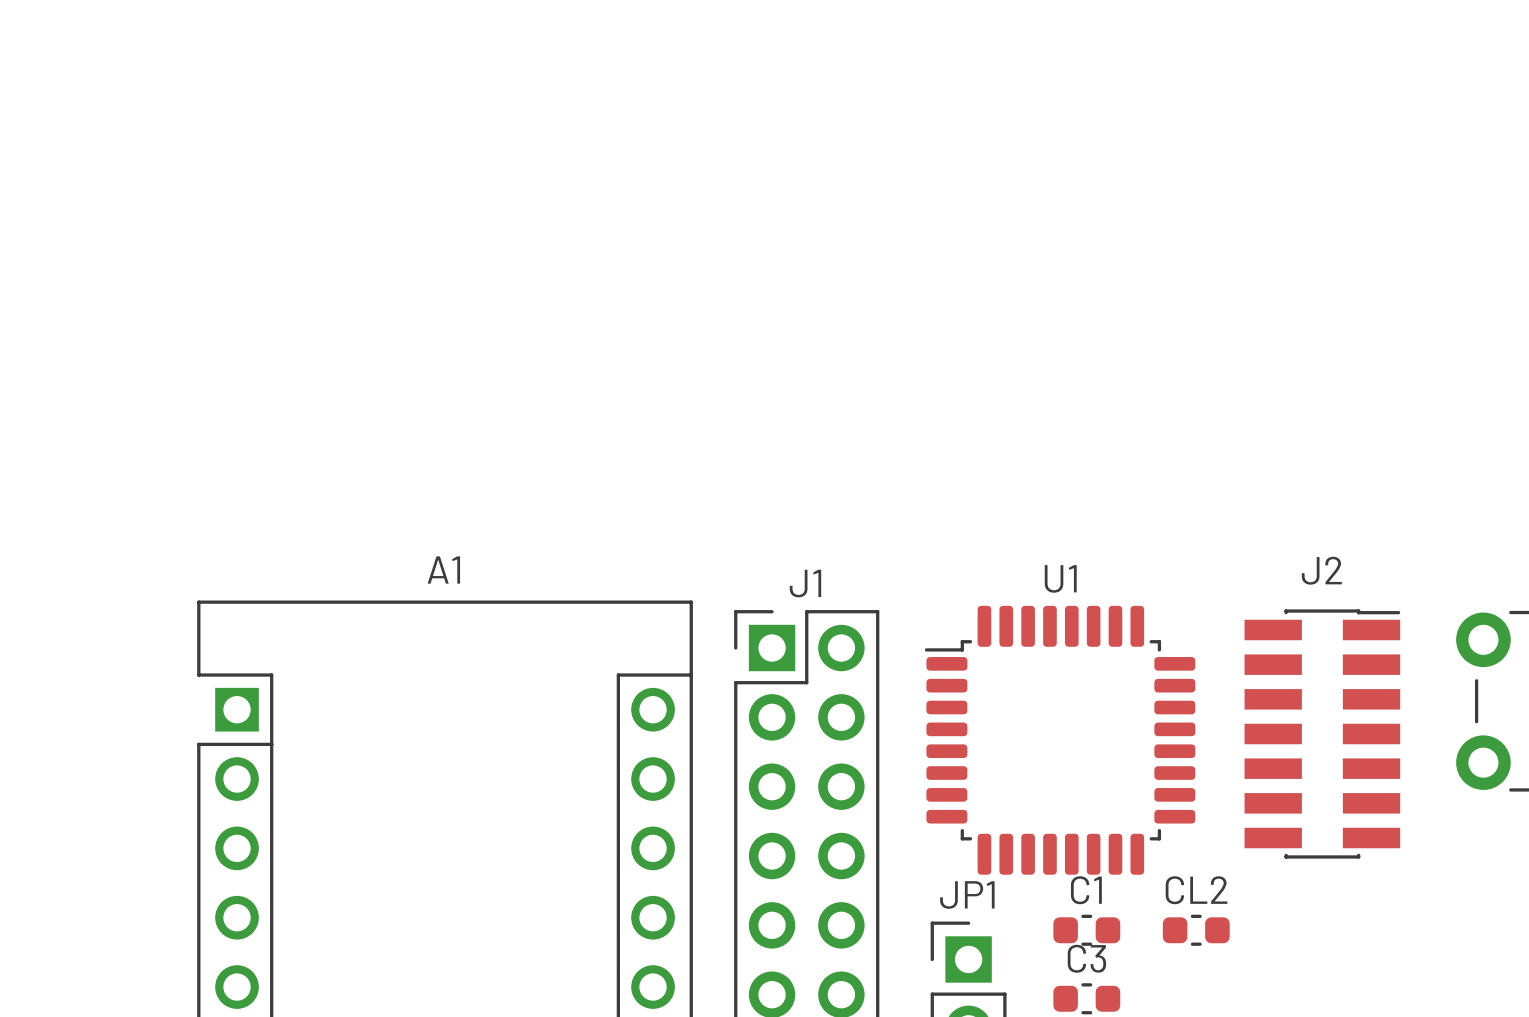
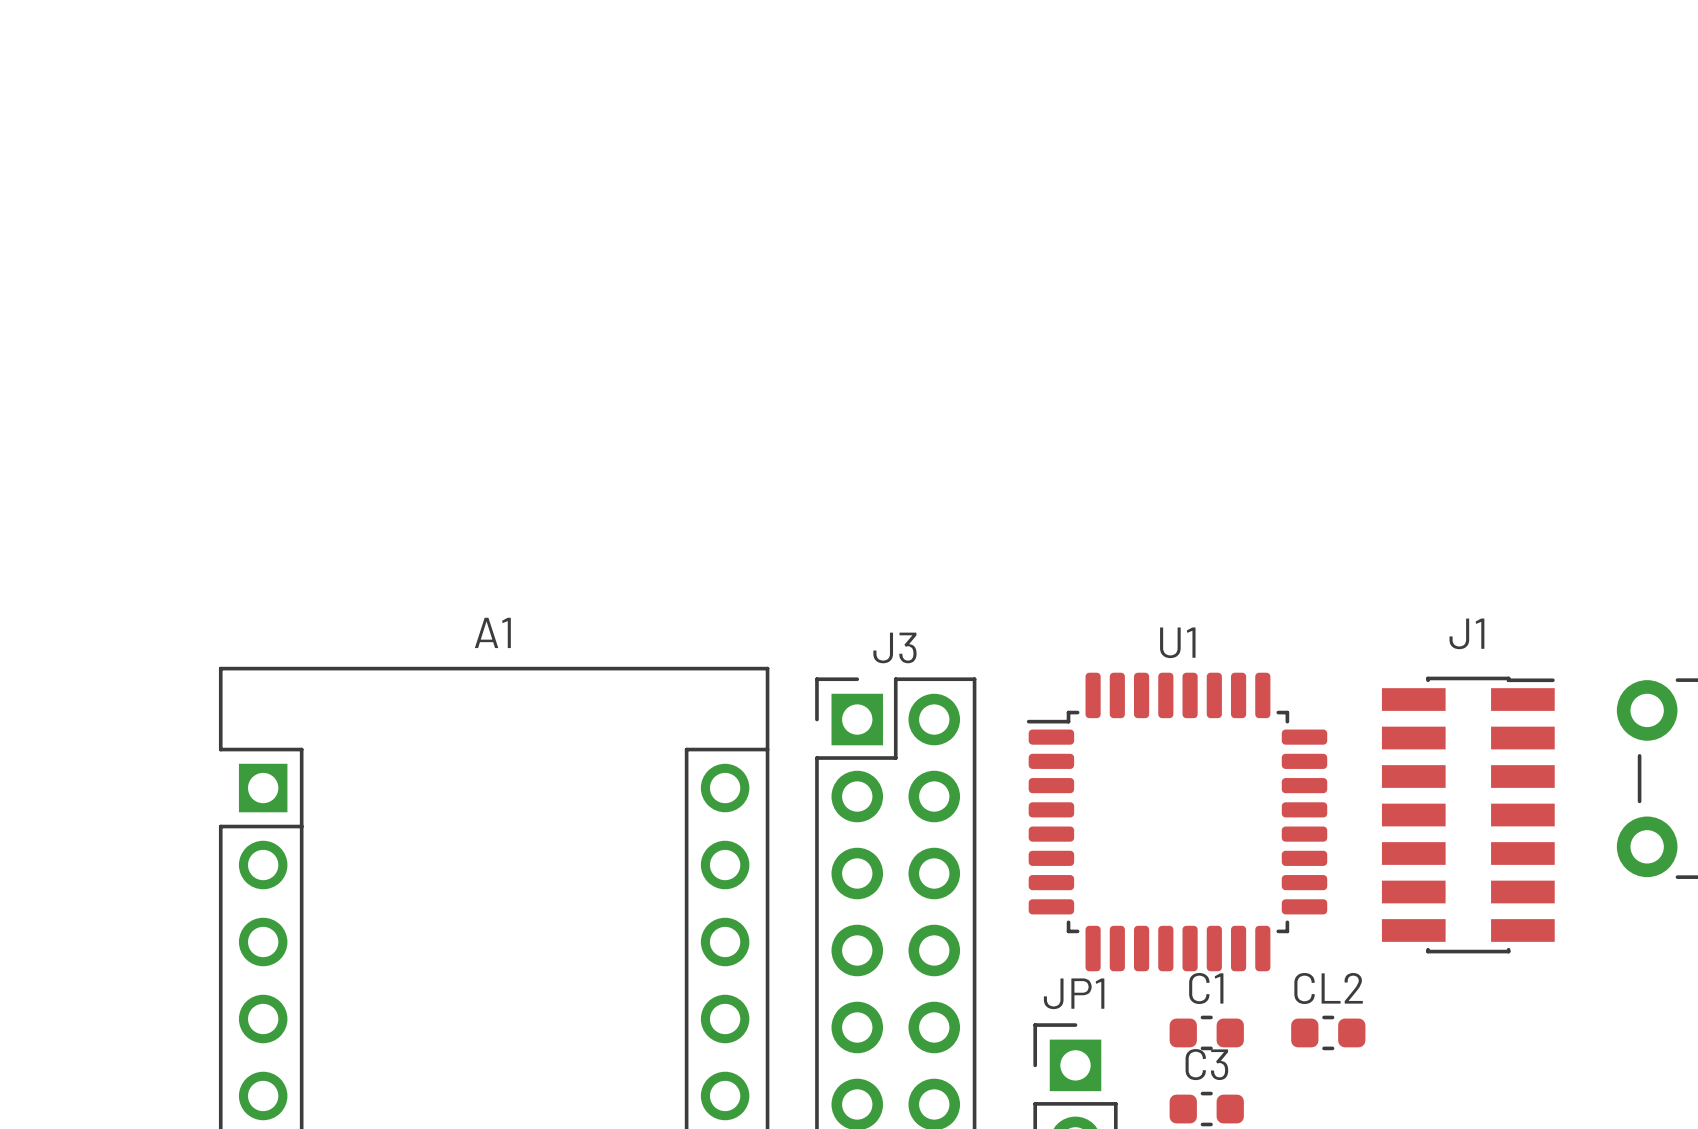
J2 name: J2 (1321, 570) -> J1 (1466, 633)
J1 name: J1 (805, 583) -> J3 (894, 647)

